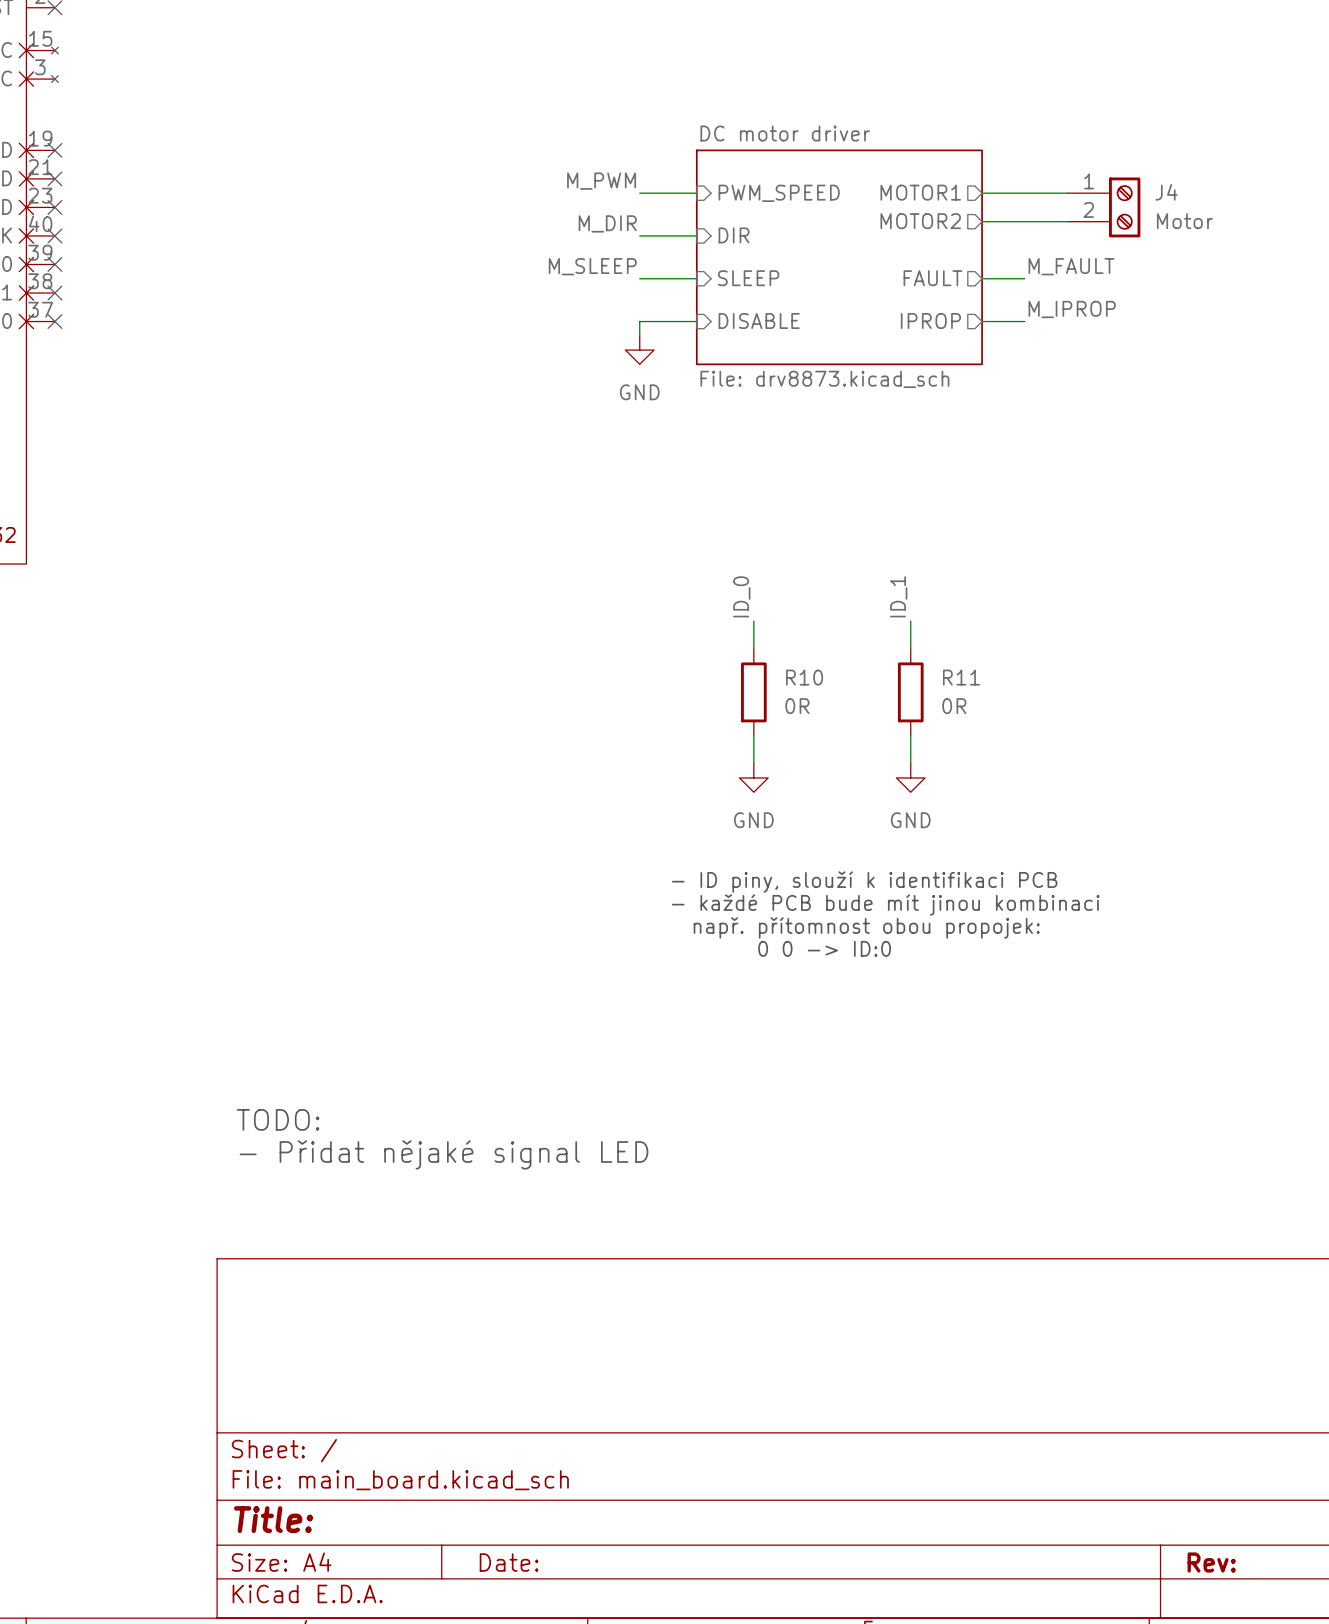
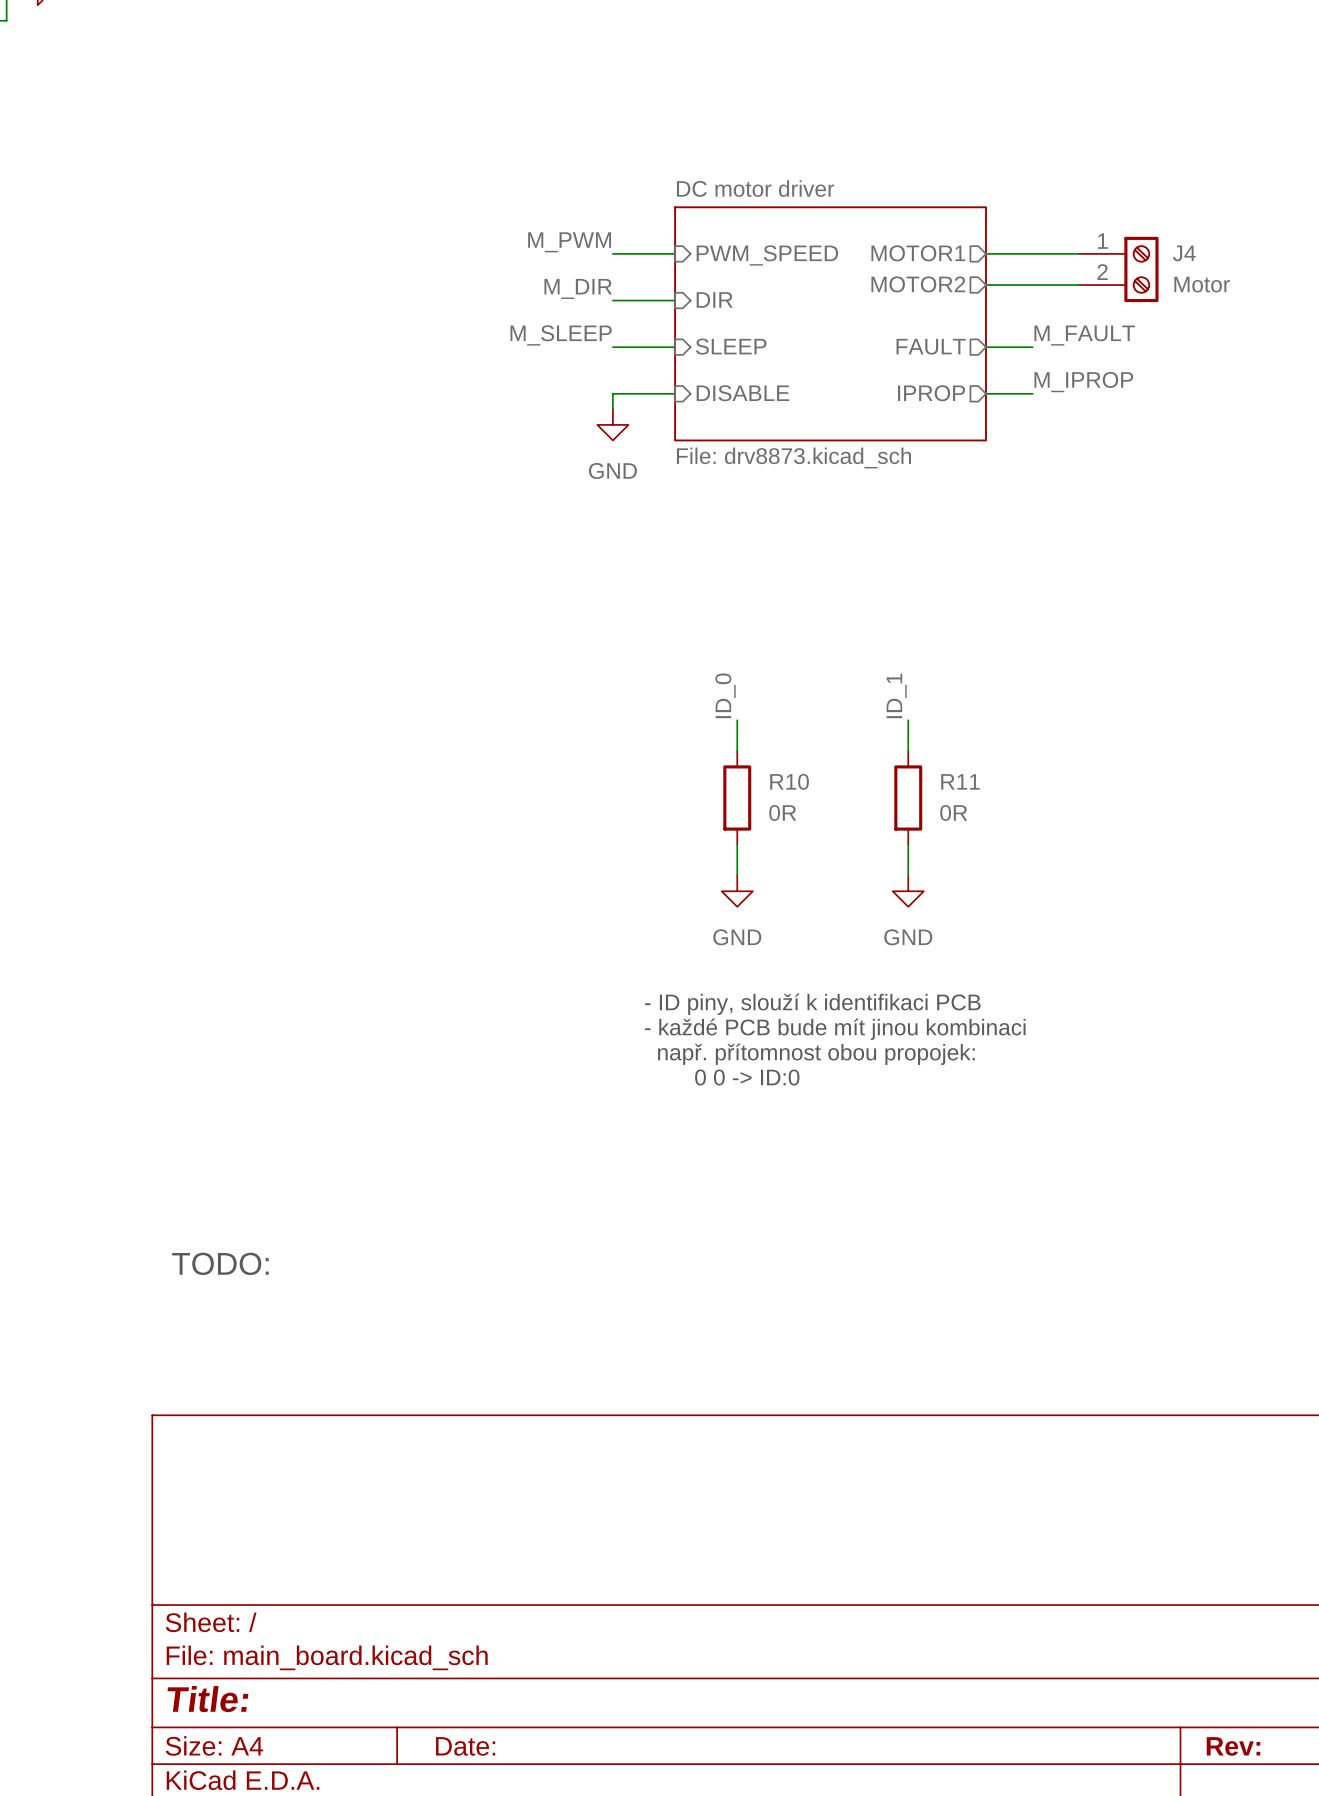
text: - Přidat nějaké signal LED (444, 1154) -> none

